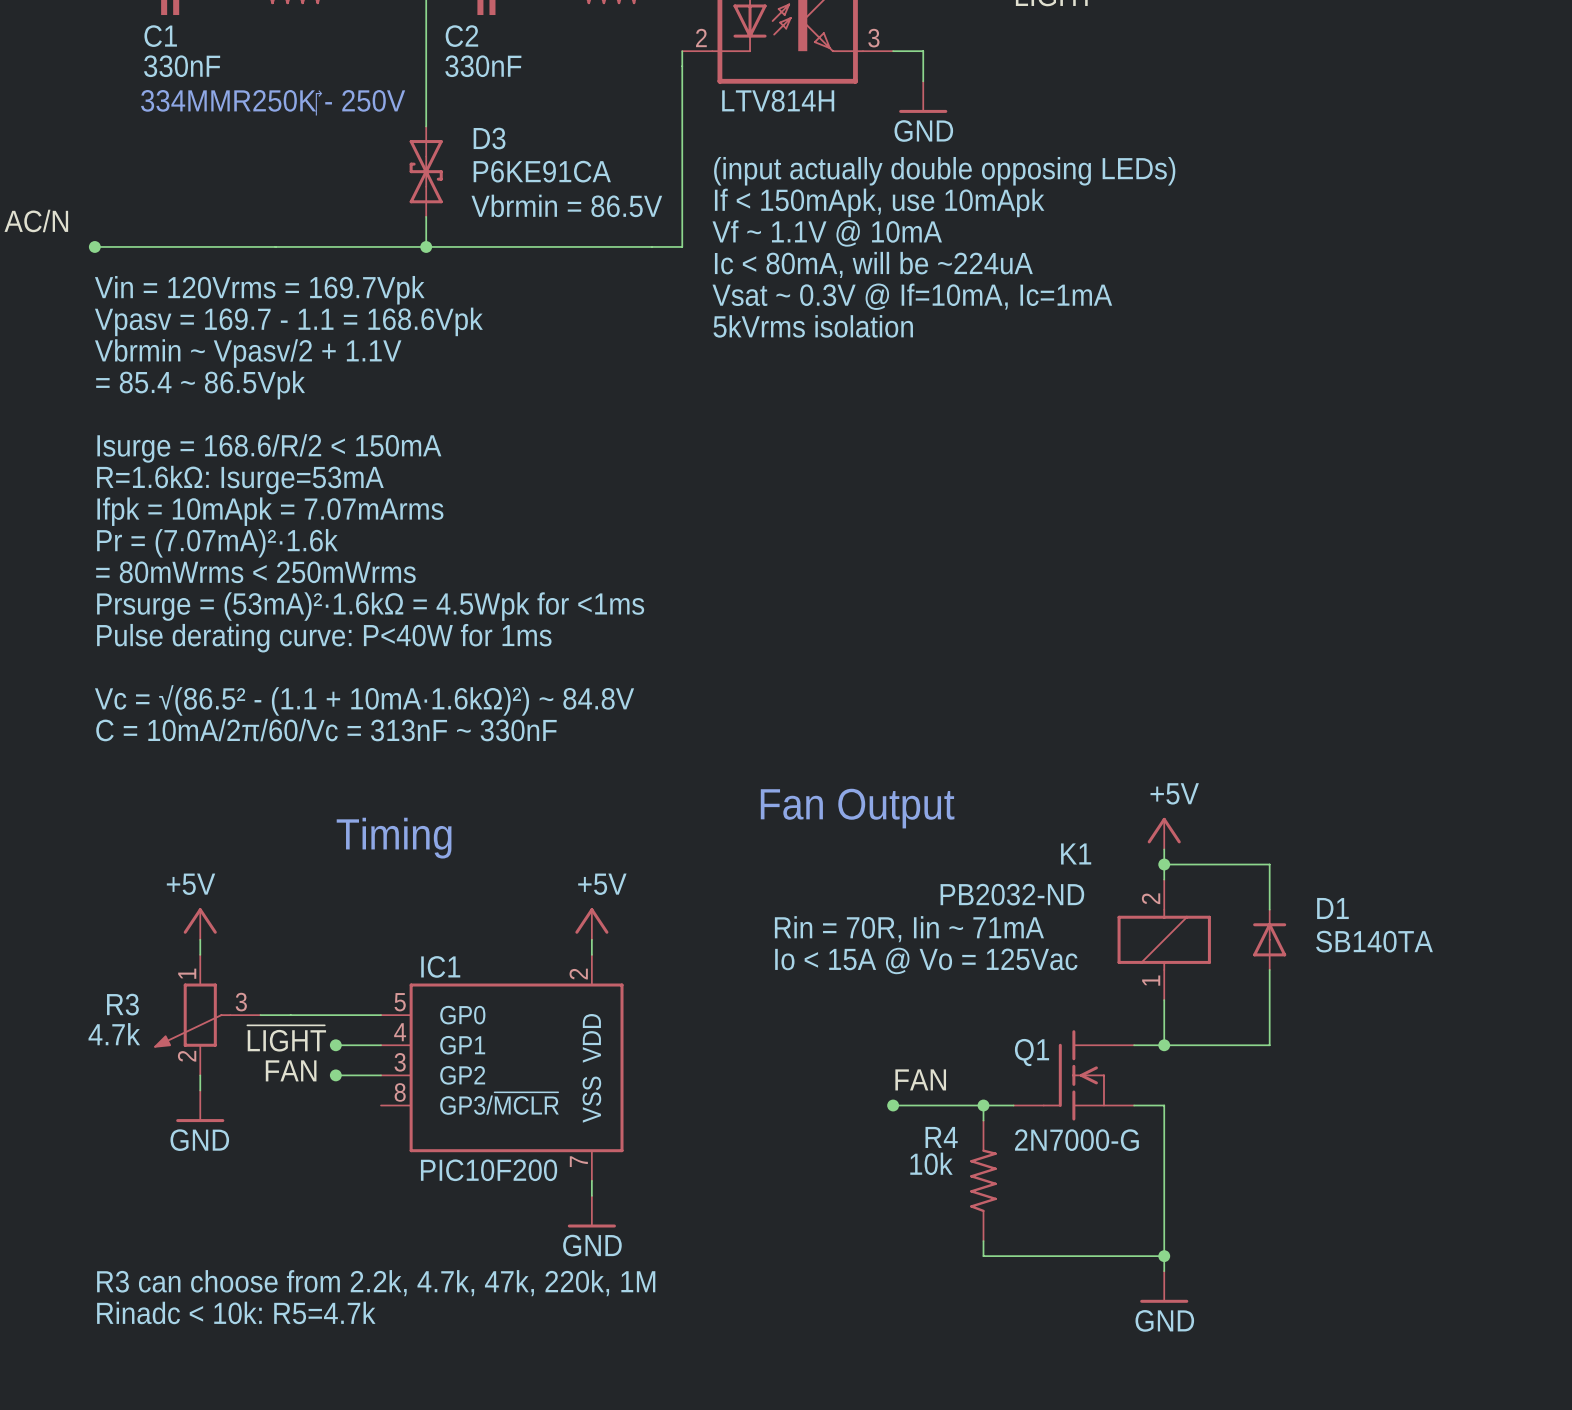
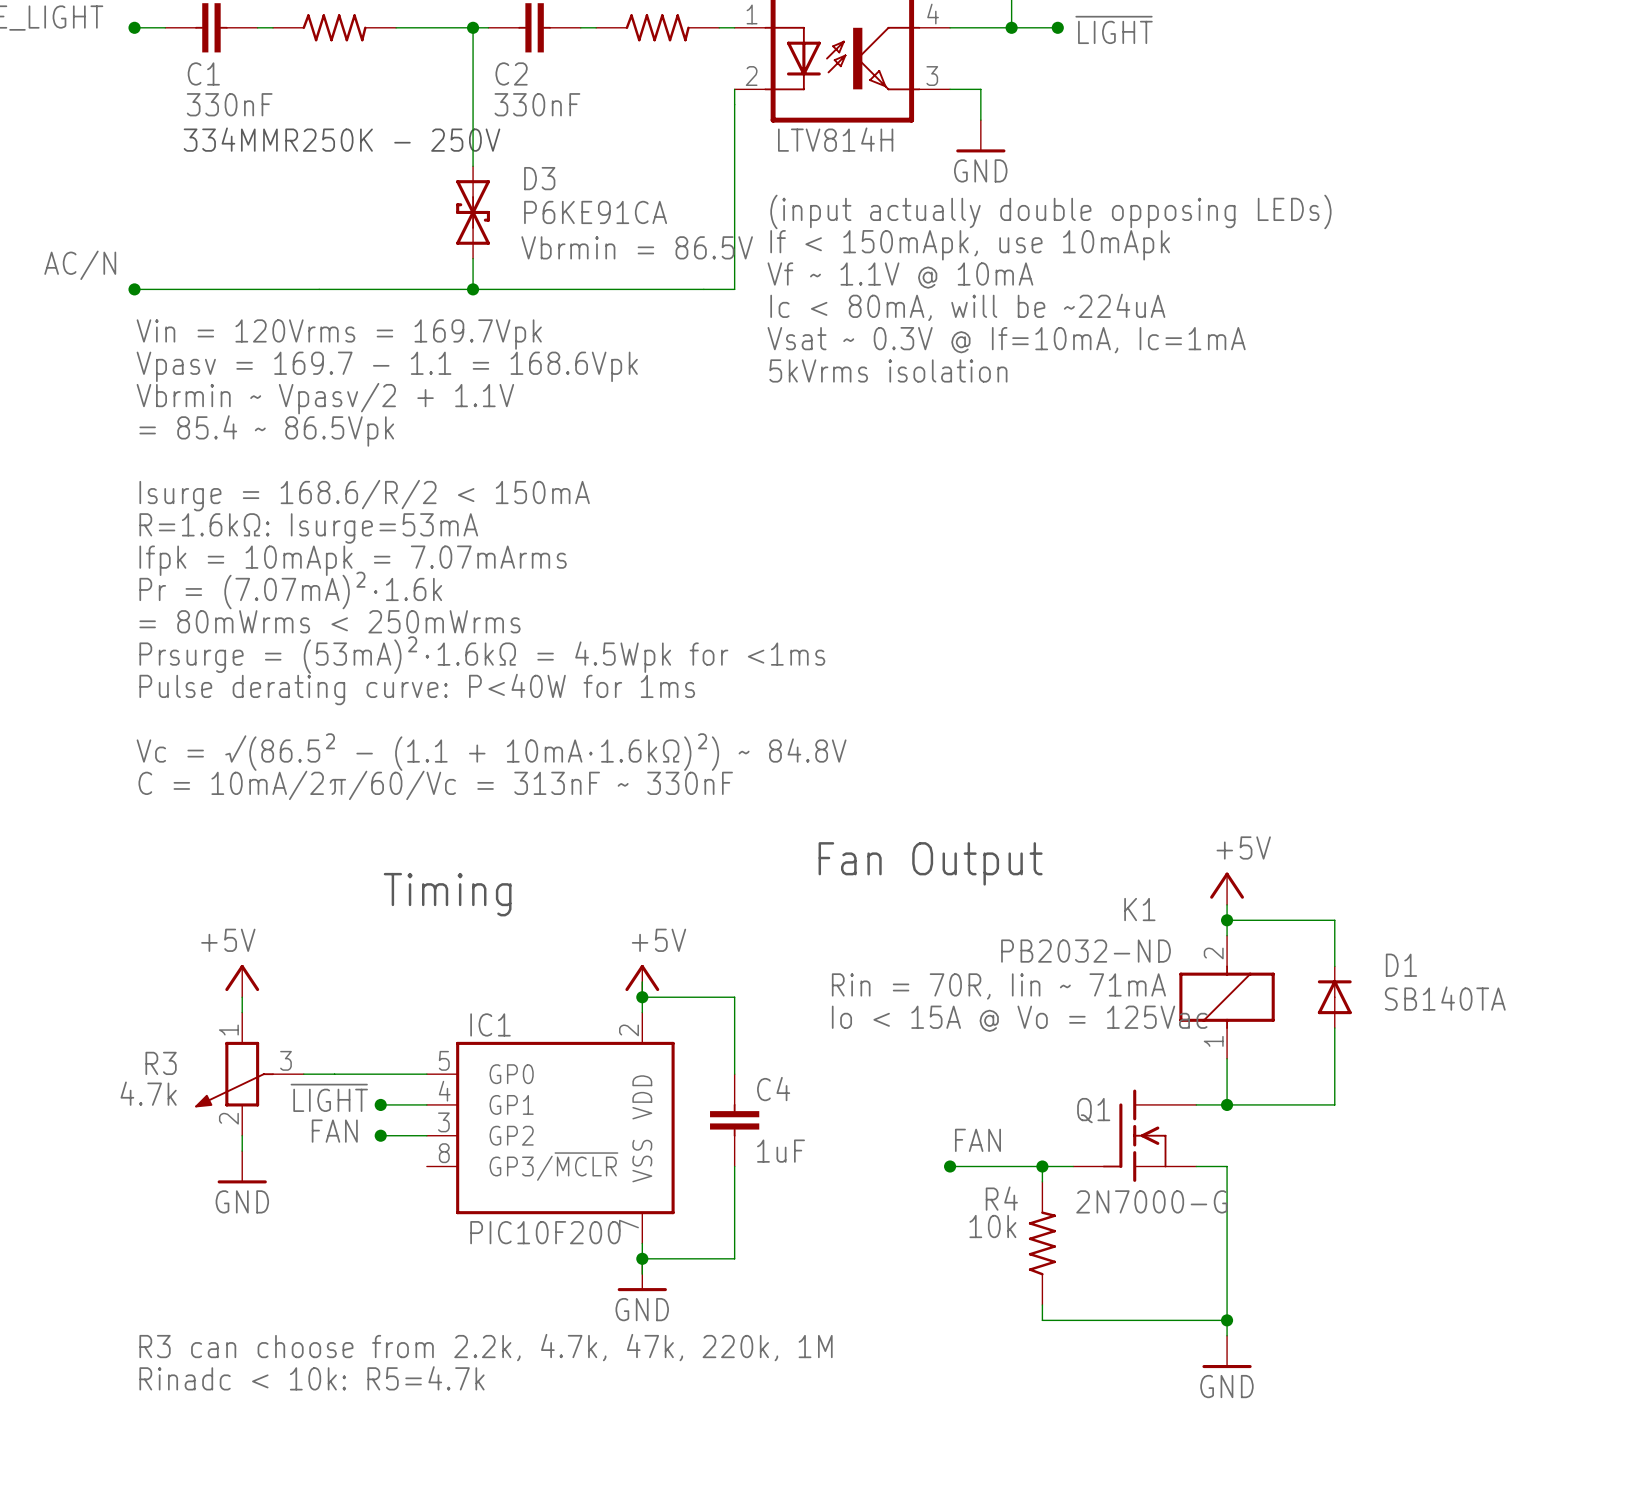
wire: none -> (642, 981) (642, 997) (734, 997) (734, 1074)
junction: none -> (642, 997)
C4: none -> 1uF (734, 1120)
wire: none -> (734, 1166) (734, 1258) (642, 1258) (642, 1274)
junction: none -> (642, 1258)

